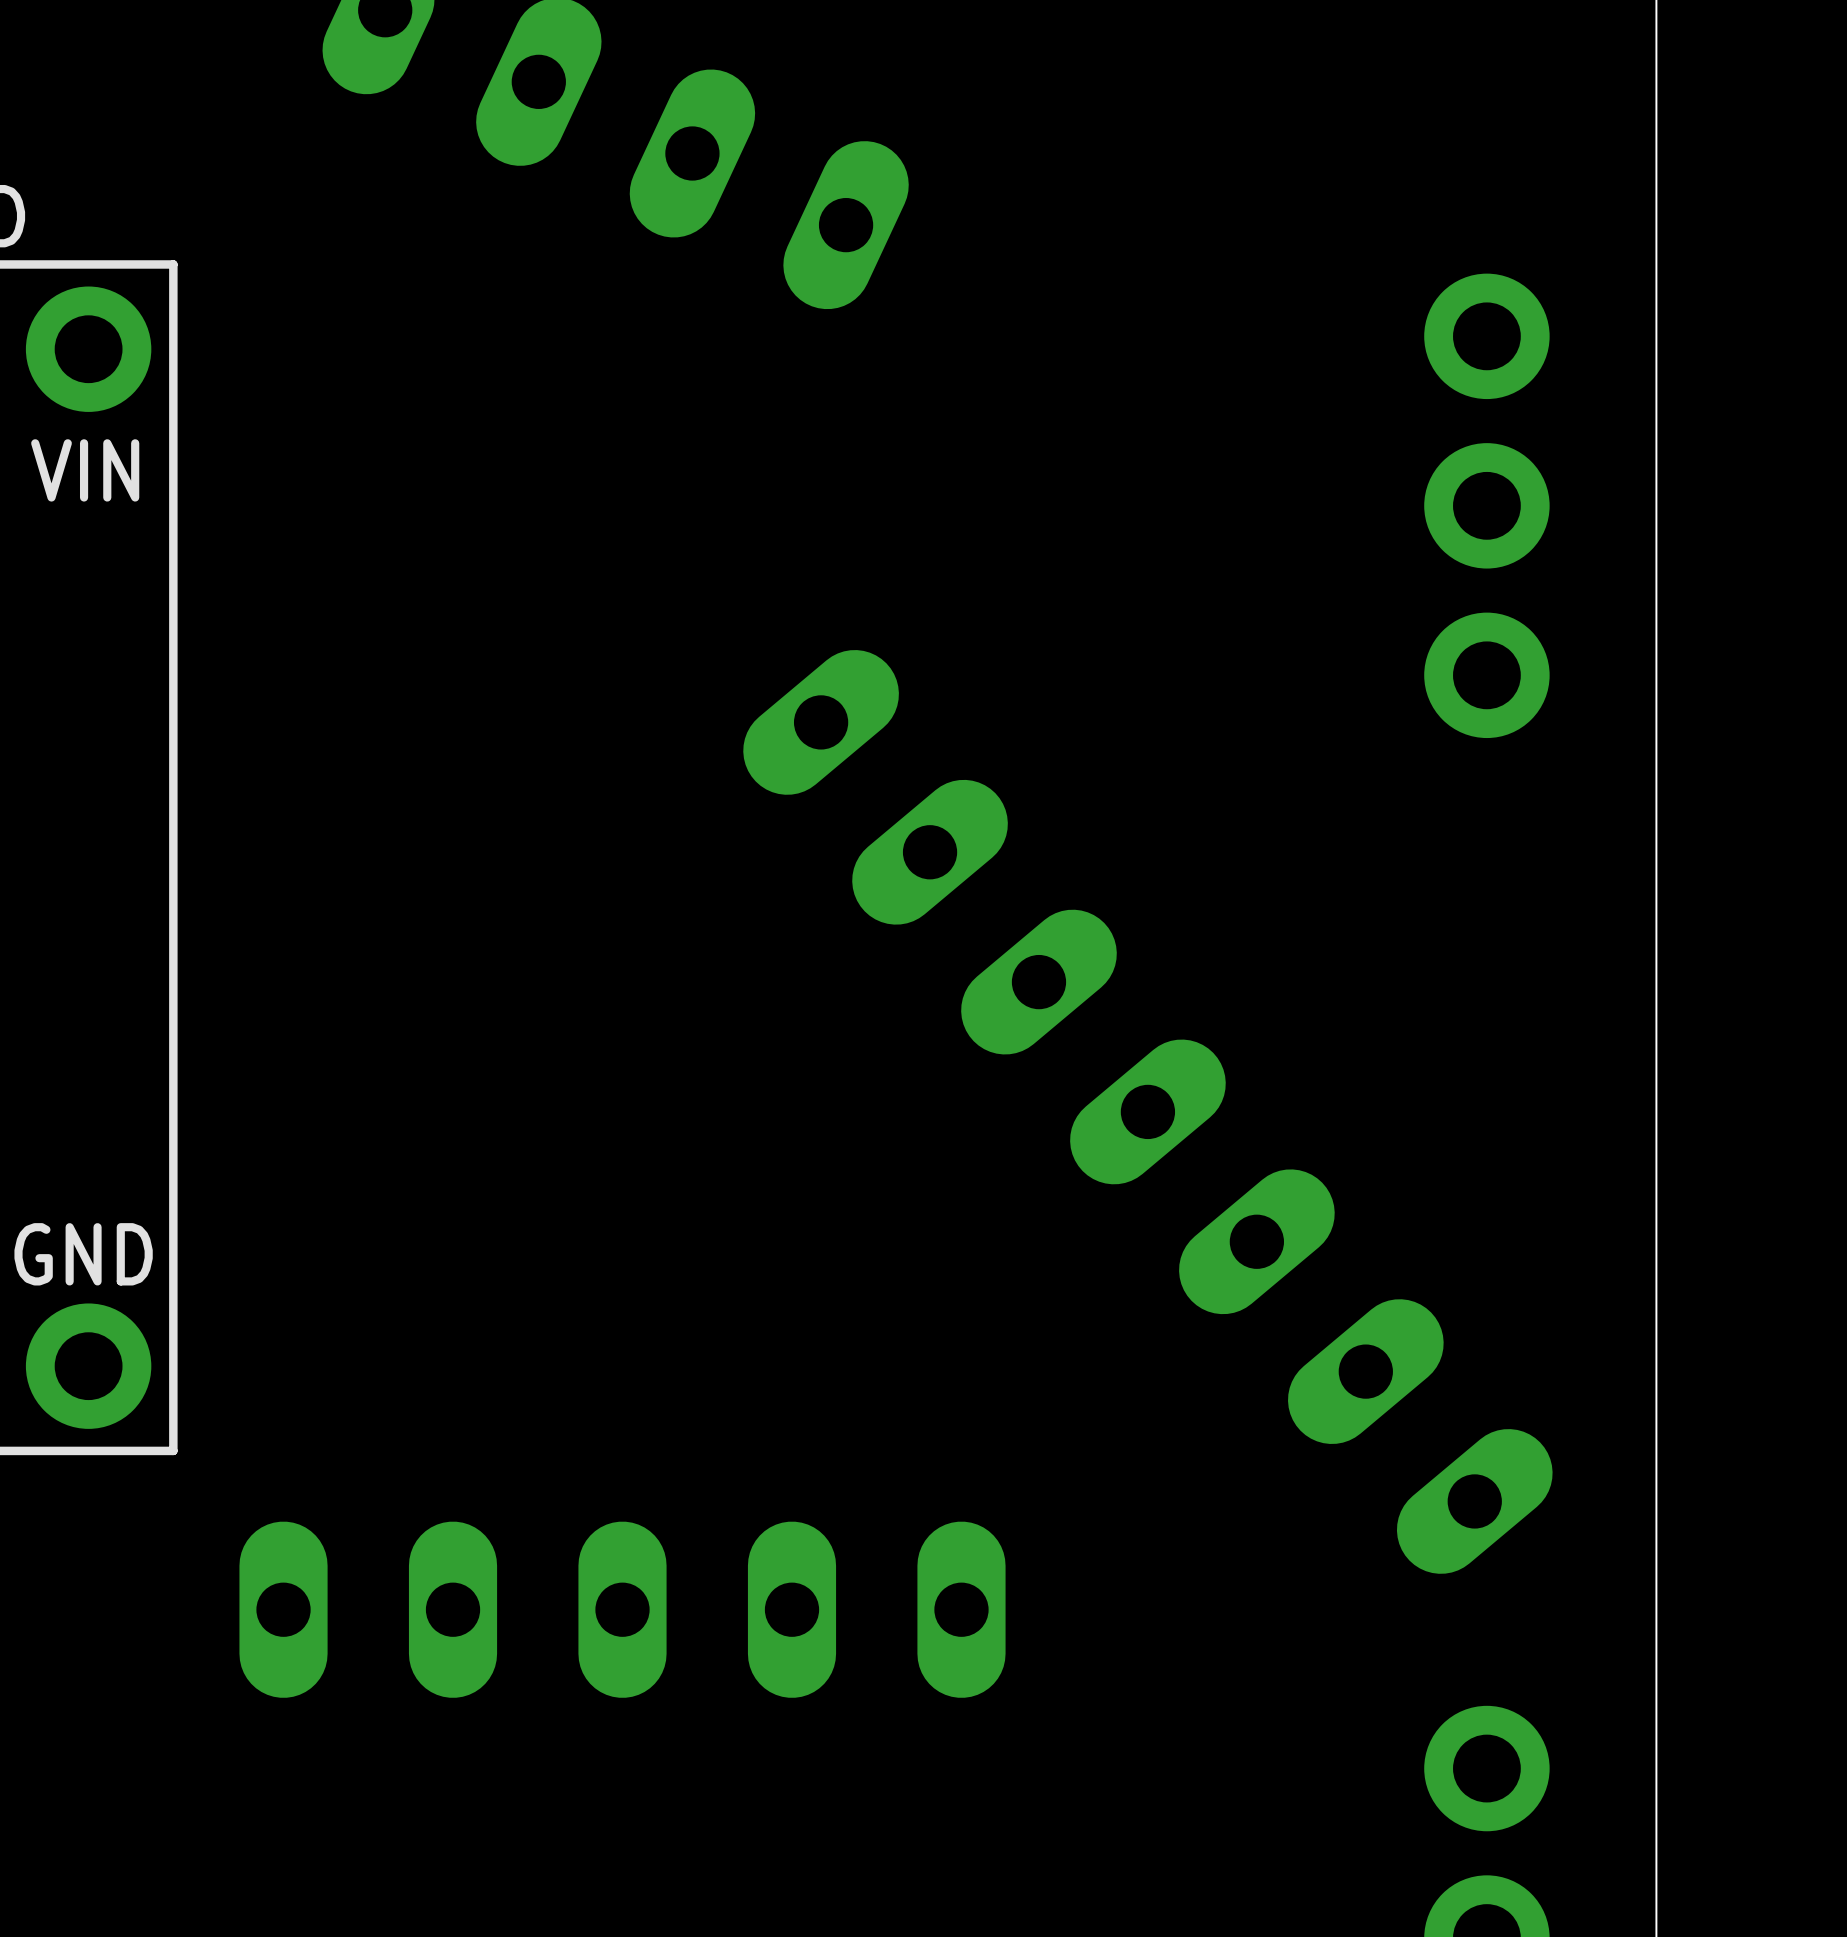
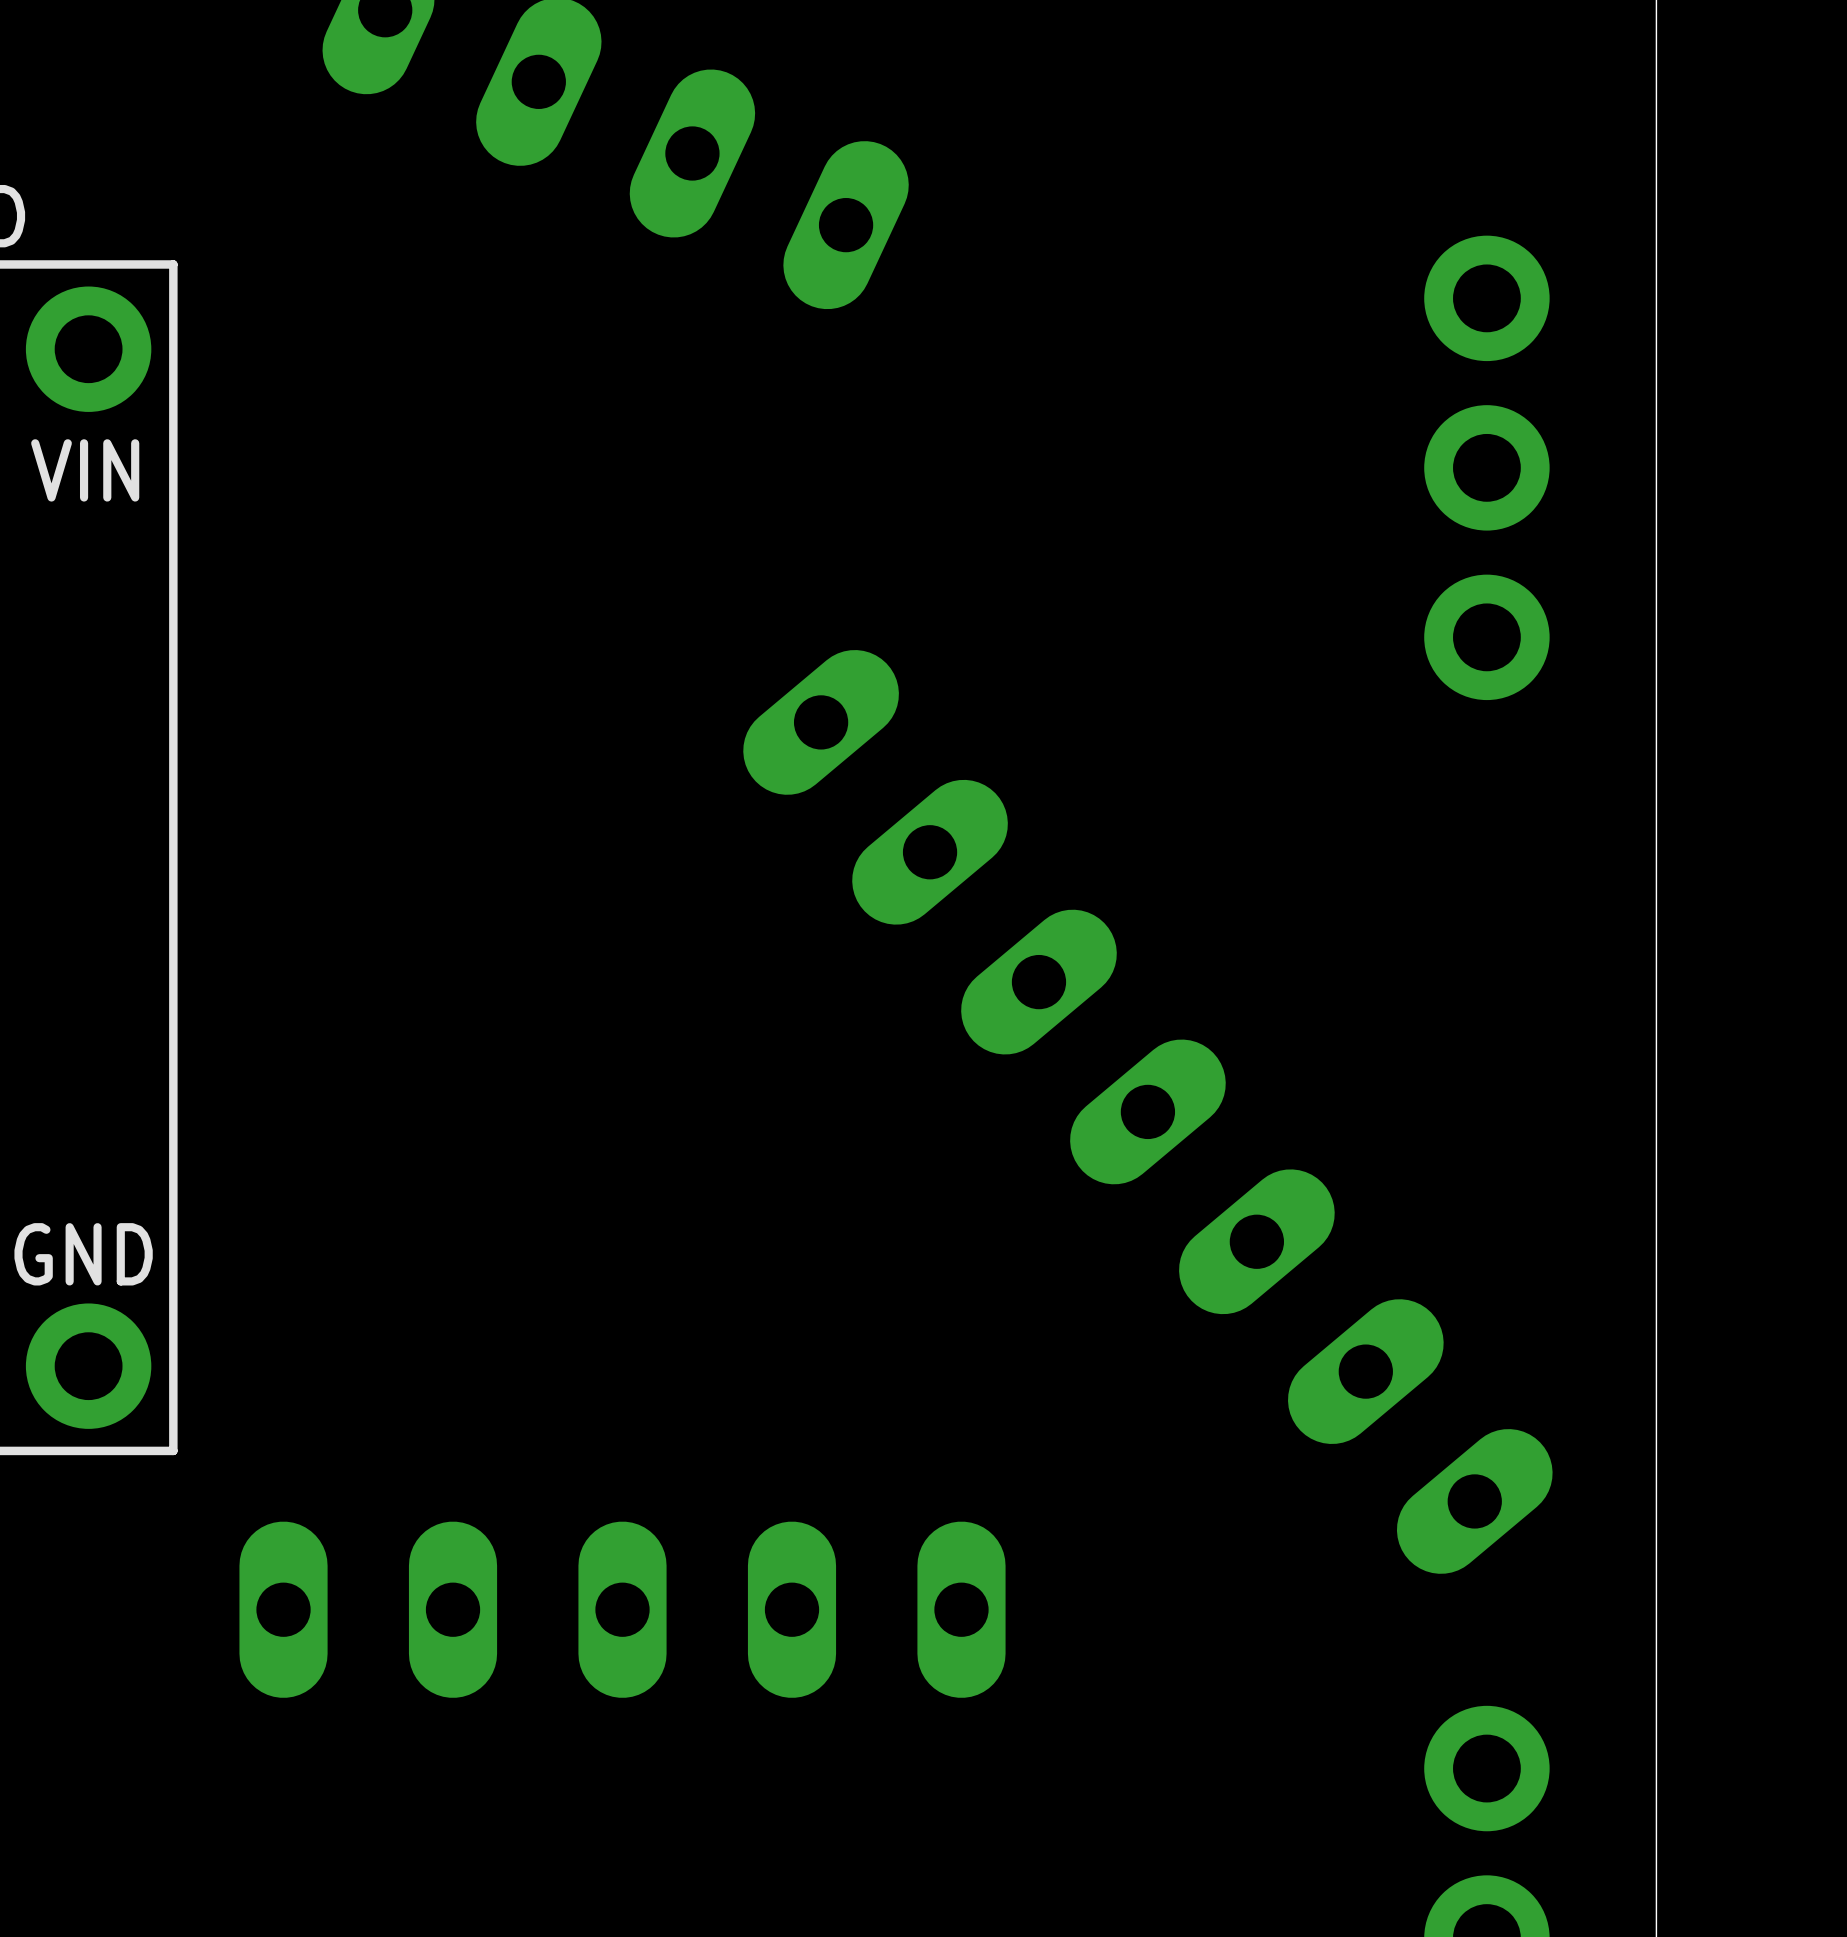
part position: (1486, 505) -> (1486, 467)

